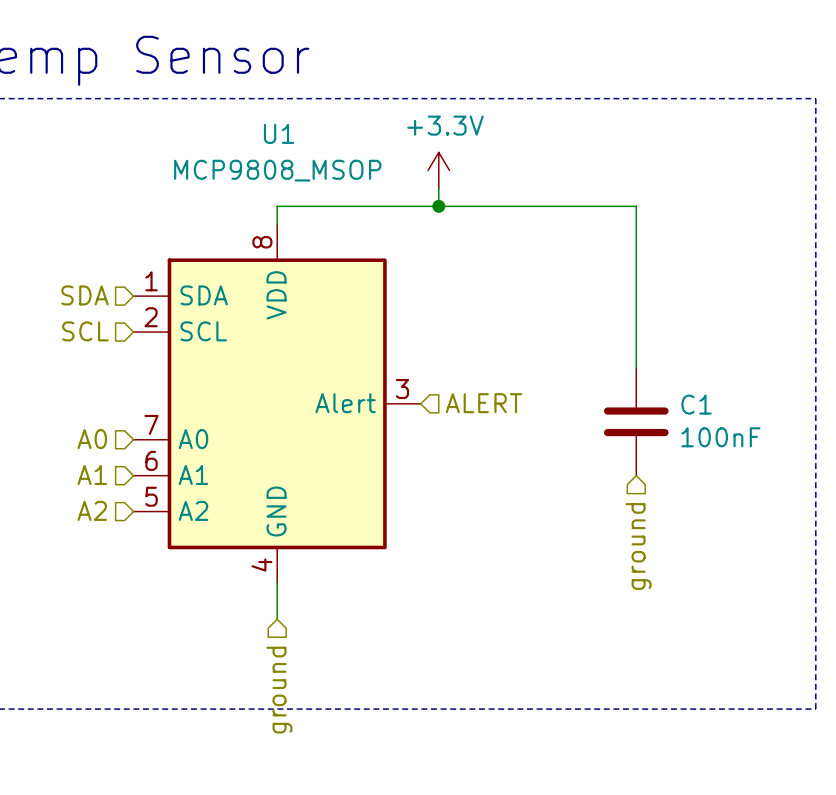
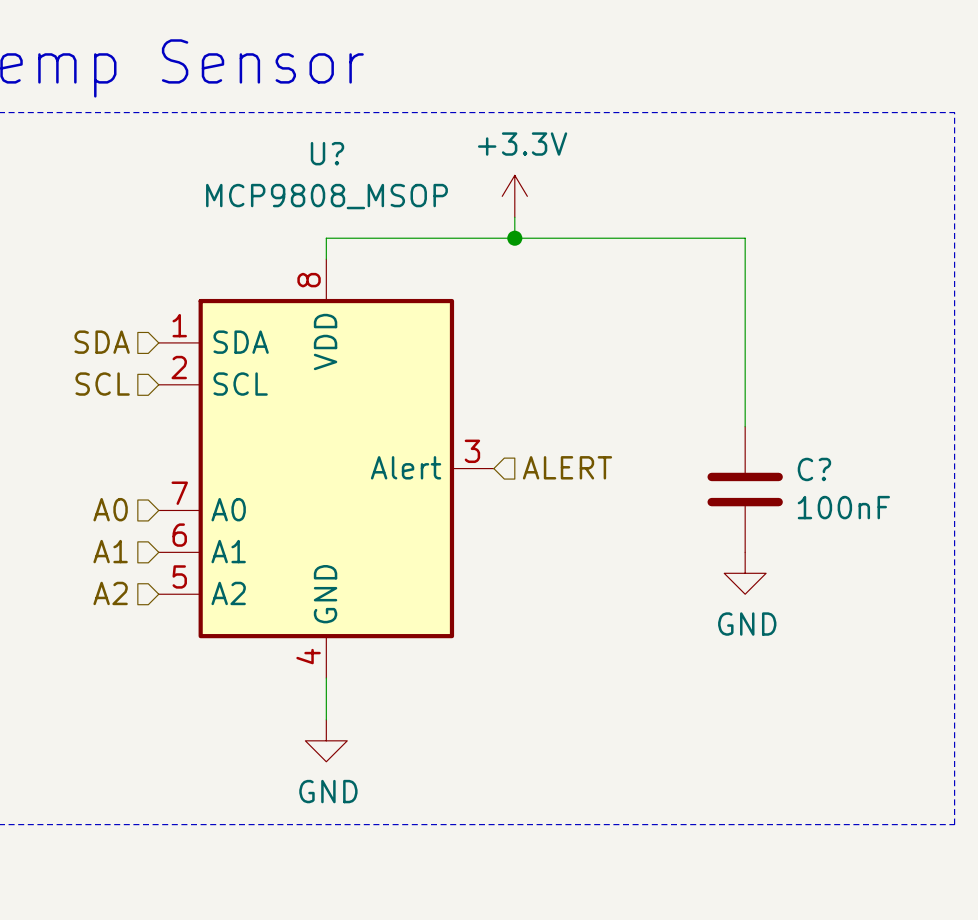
U1 name: U1 (279, 133) -> U? (327, 153)
C1 name: C1 (696, 404) -> C? (814, 469)
power symbol: none -> GND (745, 573)
hierarchical label: ground (638, 546) -> none
power symbol: none -> GND (326, 740)
hierarchical label: ground (279, 690) -> none

